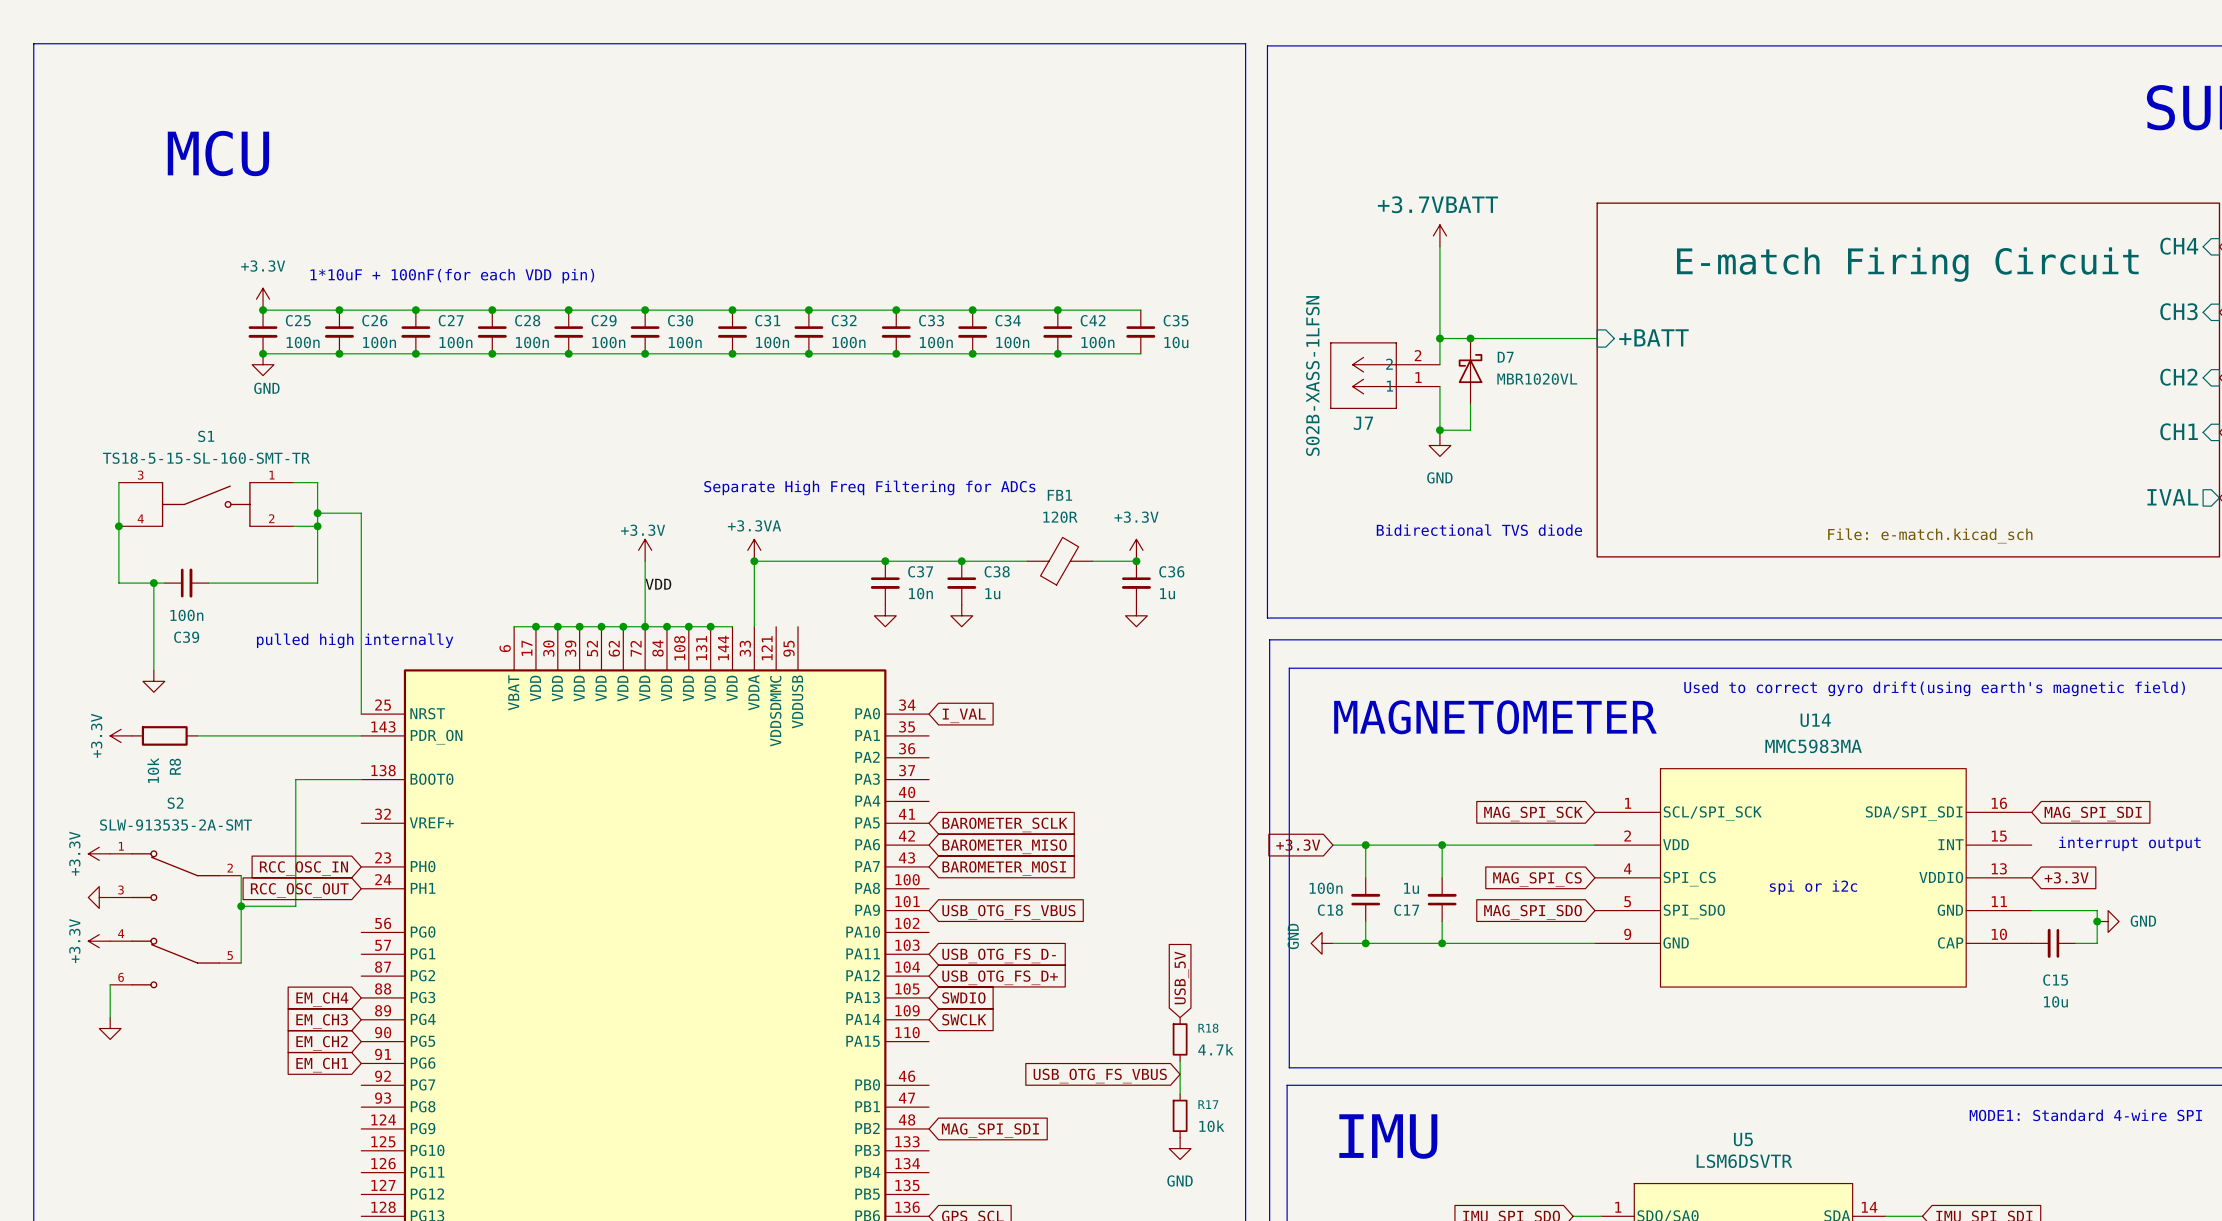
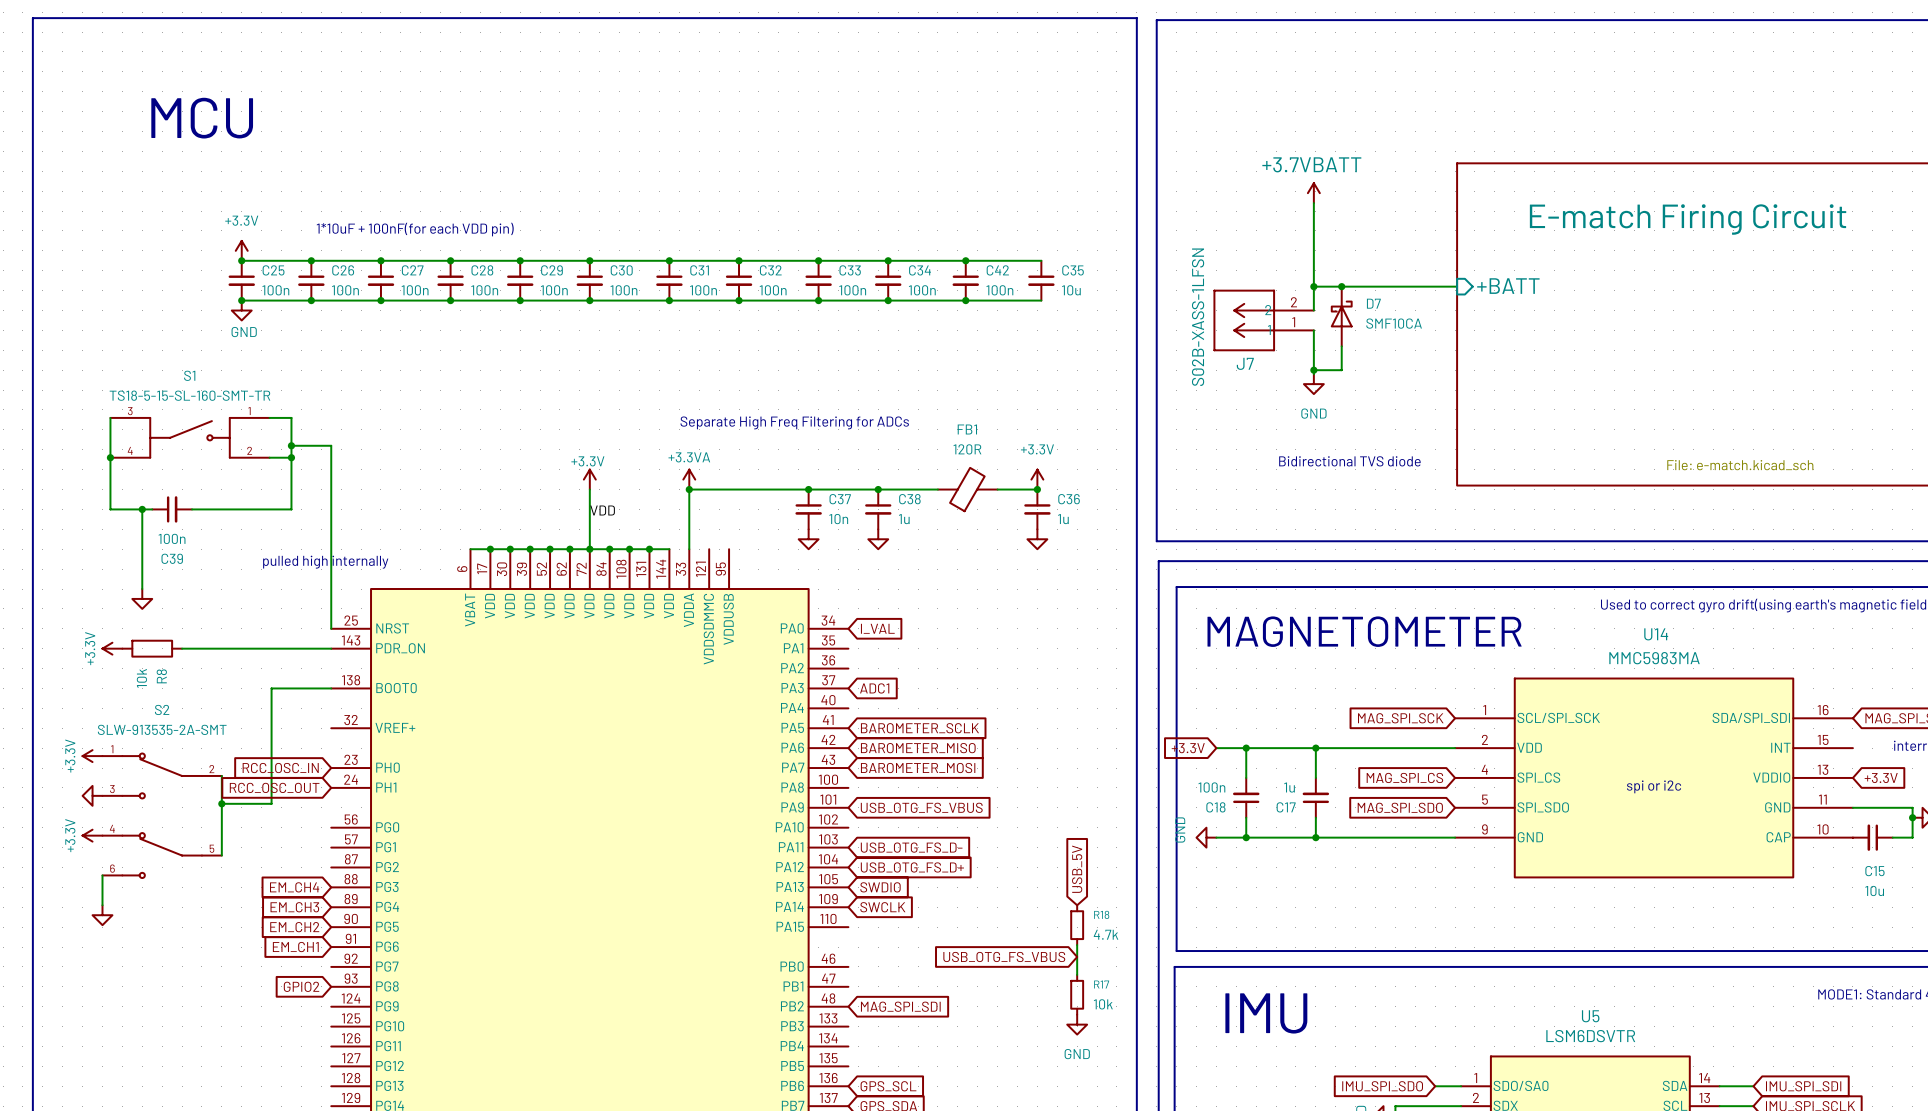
D7 value: MBR1020VL (1537, 379) -> SMF10CA (1394, 323)
global label: none -> ADC1 (874, 688)
global label: none -> GPIO2 (301, 986)

